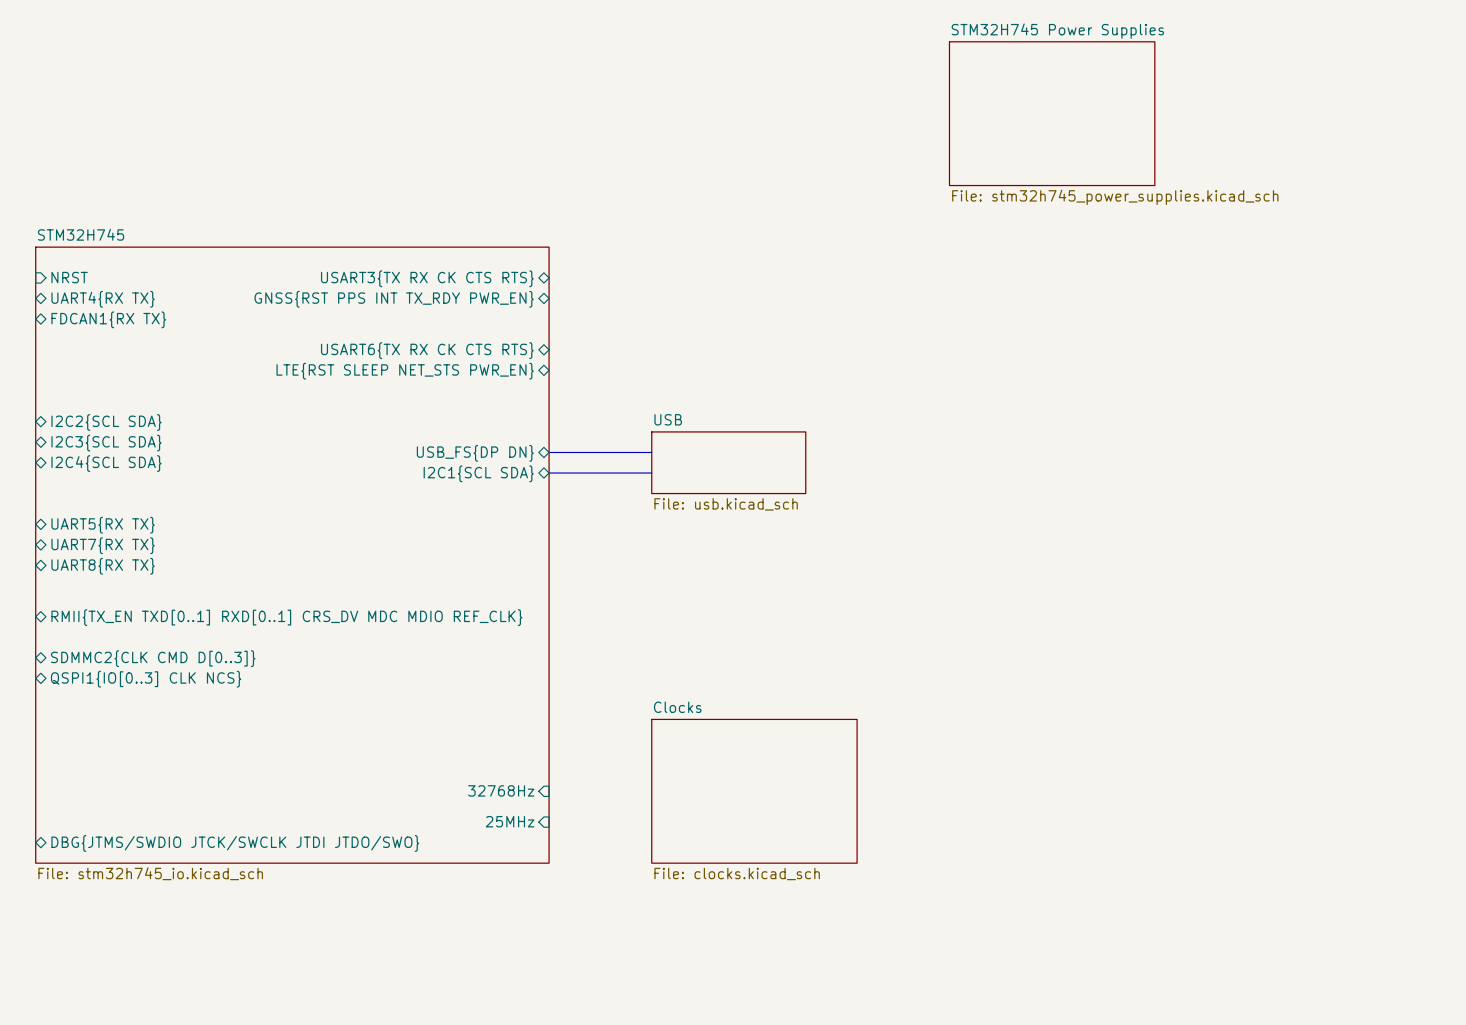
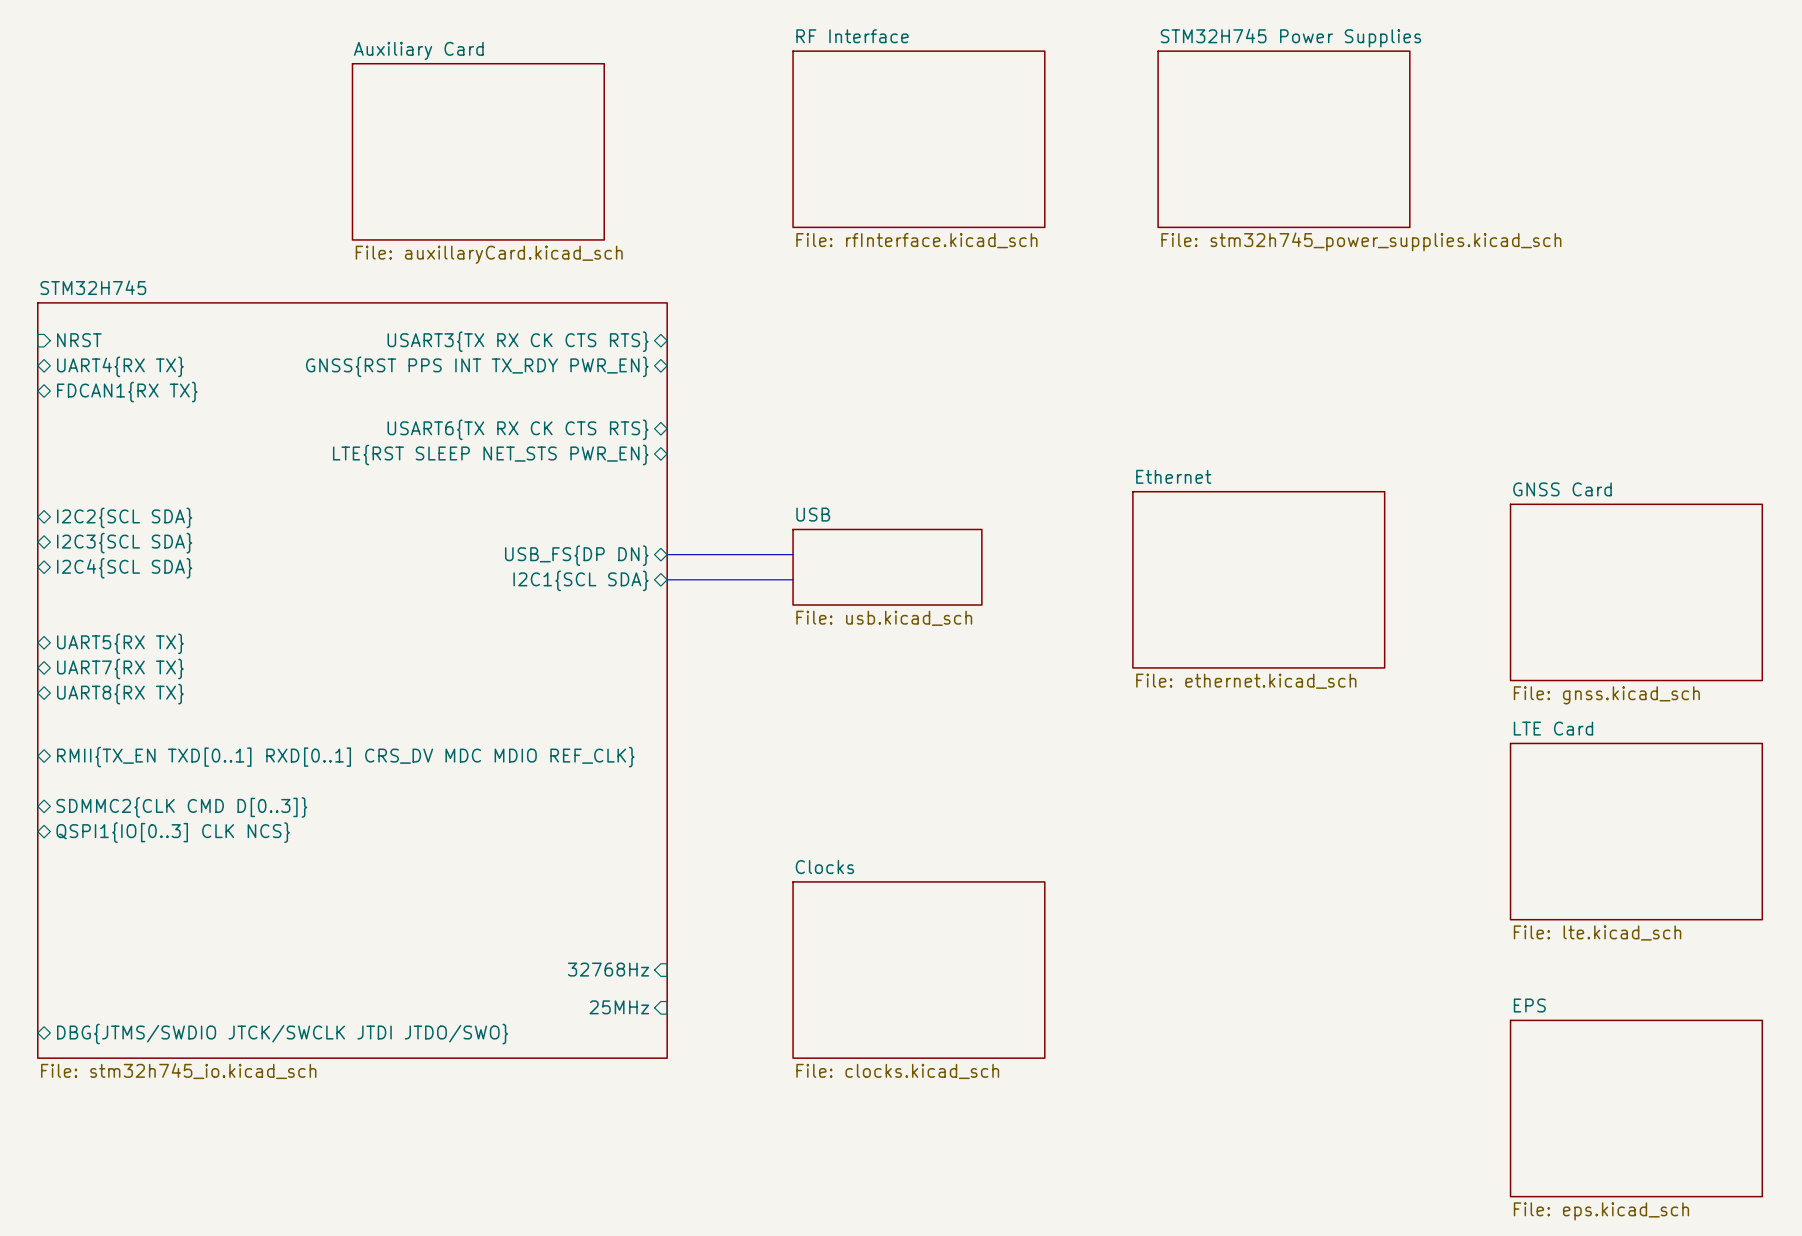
sheet RF Interface: none -> File: rfInterface.kicad_sch (918, 139)
sheet Auxiliary Card: none -> File: auxillaryCard.kicad_sch (478, 151)
sheet Ethernet: none -> File: ethernet.kicad_sch (1258, 579)
sheet GNSS Card: none -> File: gnss.kicad_sch (1636, 592)
sheet LTE Card: none -> File: lte.kicad_sch (1636, 831)
sheet EPS: none -> File: eps.kicad_sch (1636, 1108)

